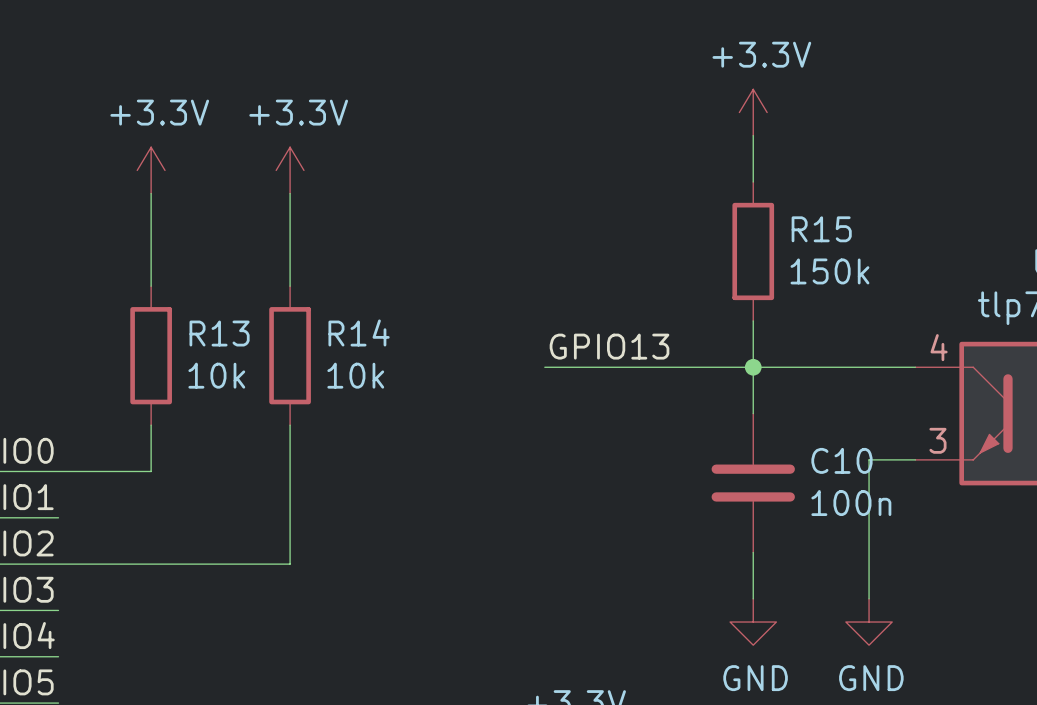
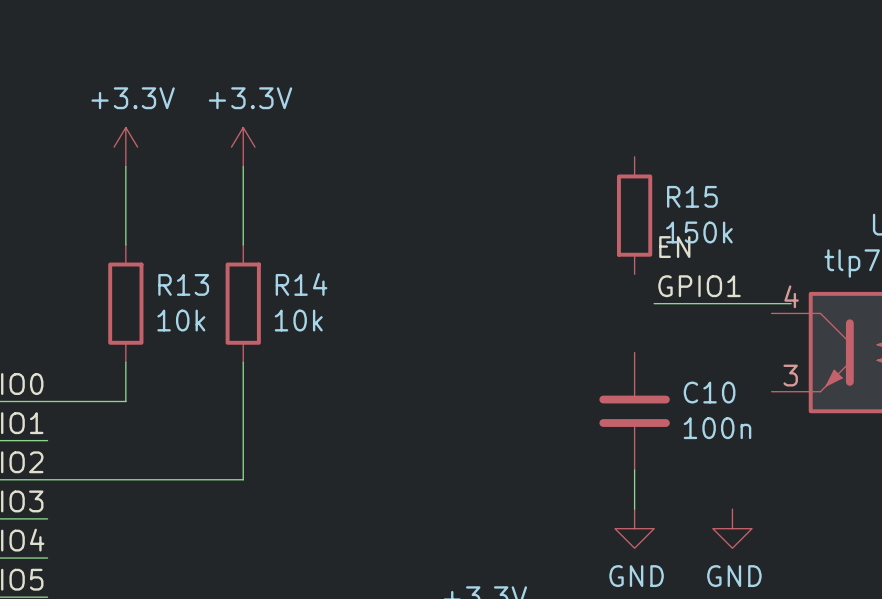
power symbol: +3.3V (753, 112) -> none
wire: (753, 135) (753, 182) -> none
label: none -> EN (674, 247)
wire: (753, 320) (753, 413) -> none
label: none -> GPIO1 (699, 286)
label: GPIO13 (609, 346) -> none
wire: none -> (654, 303) (791, 303)
wire: (544, 367) (915, 367) -> none
junction: (753, 367) -> none
wire: (915, 459) (869, 459) (869, 598) -> none

